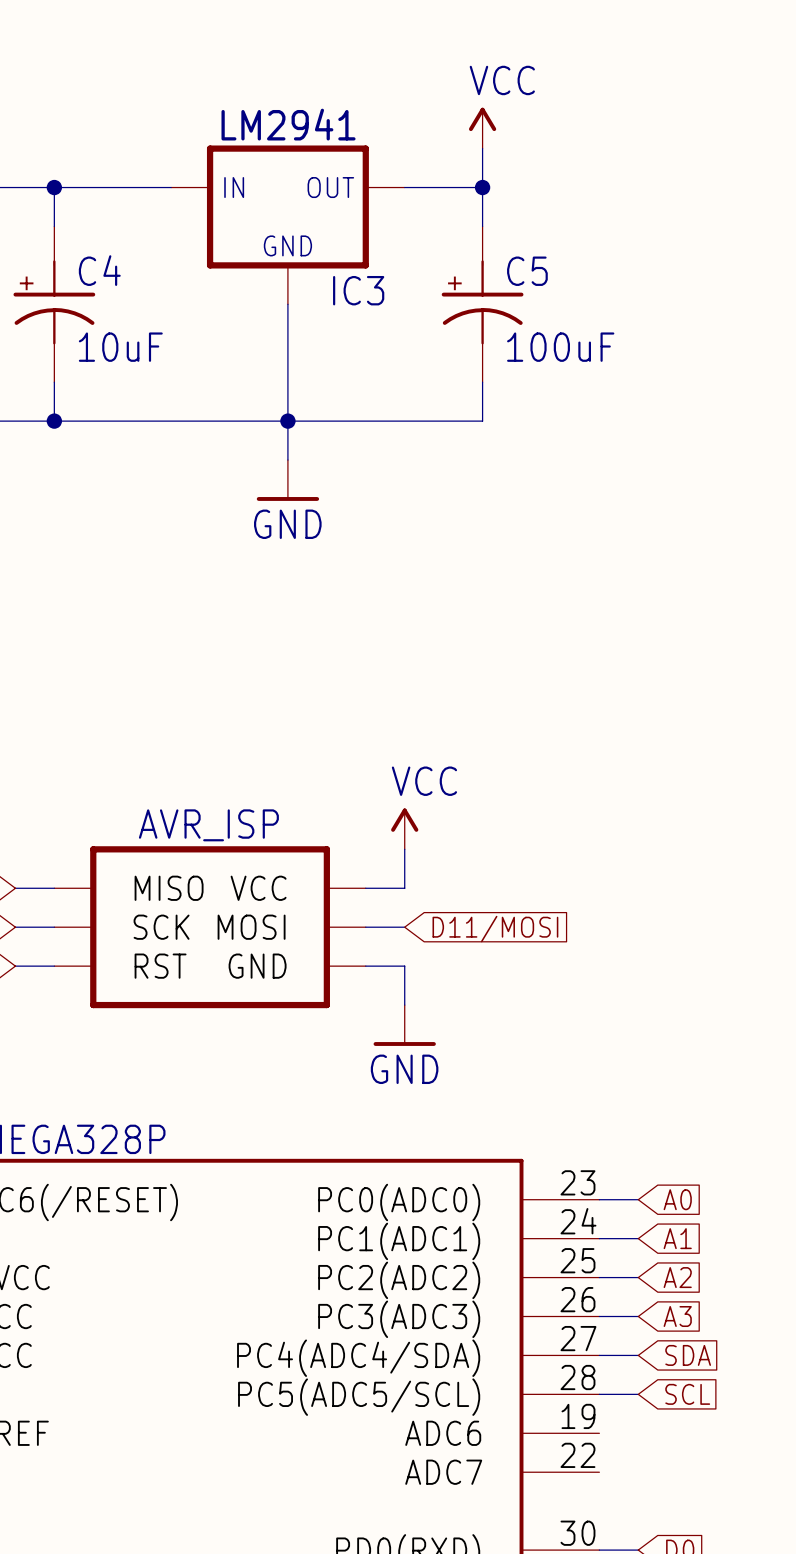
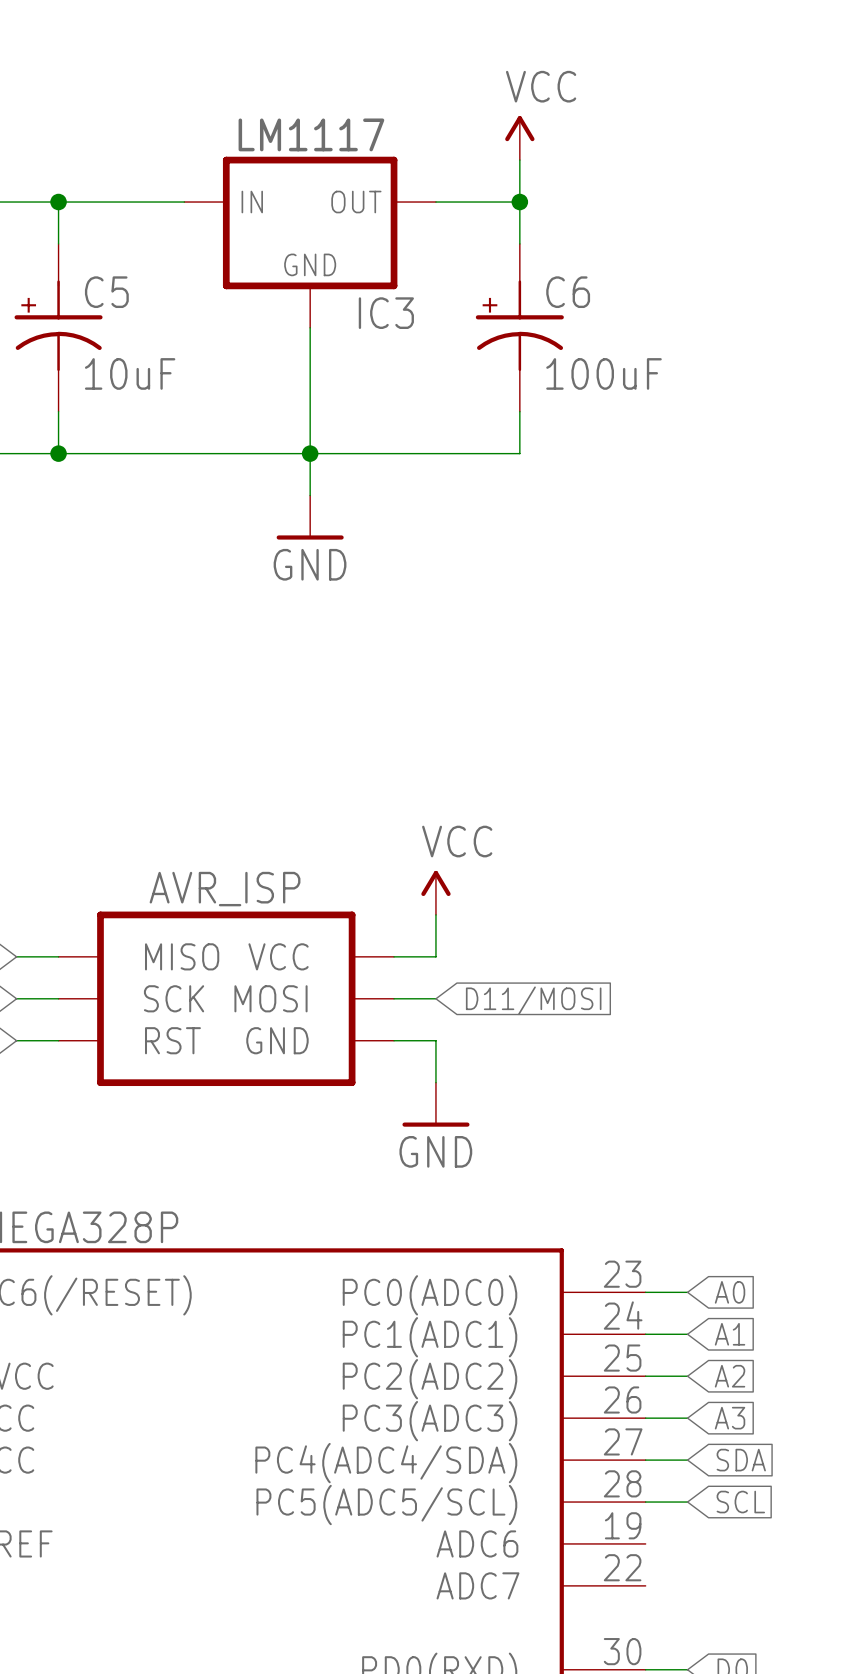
IC3 value: LM2941 (288, 124) -> LM1117 (311, 134)
C4 name: C4 (99, 270) -> C5 (106, 292)
C5 name: C5 (527, 271) -> C6 (568, 292)

